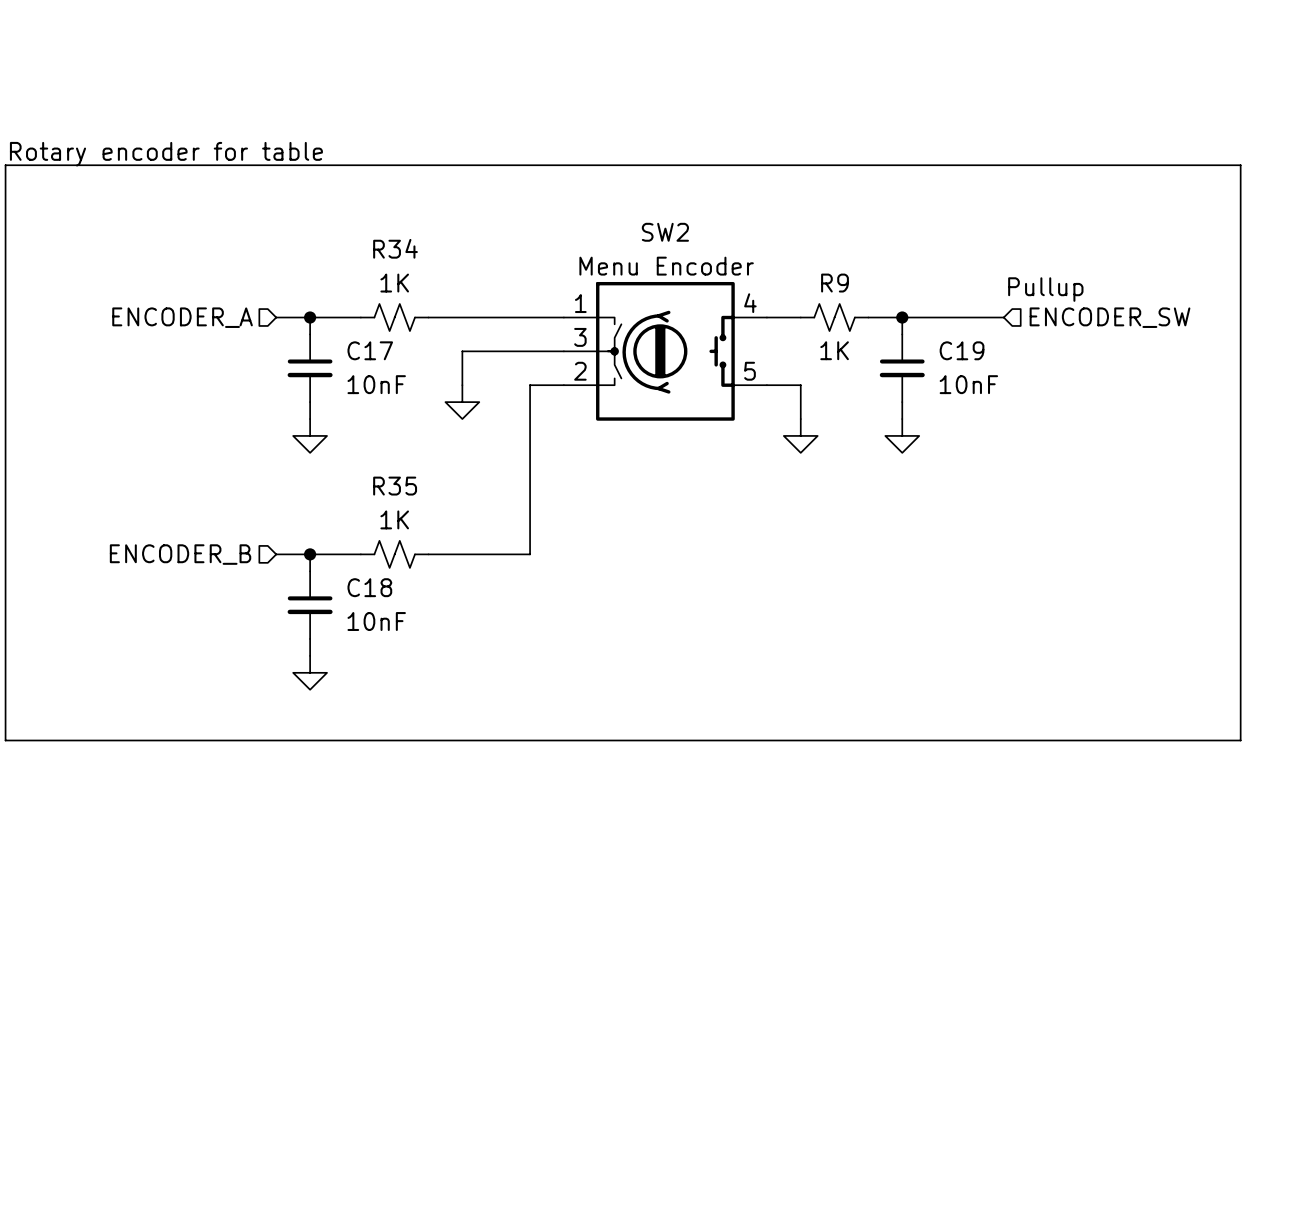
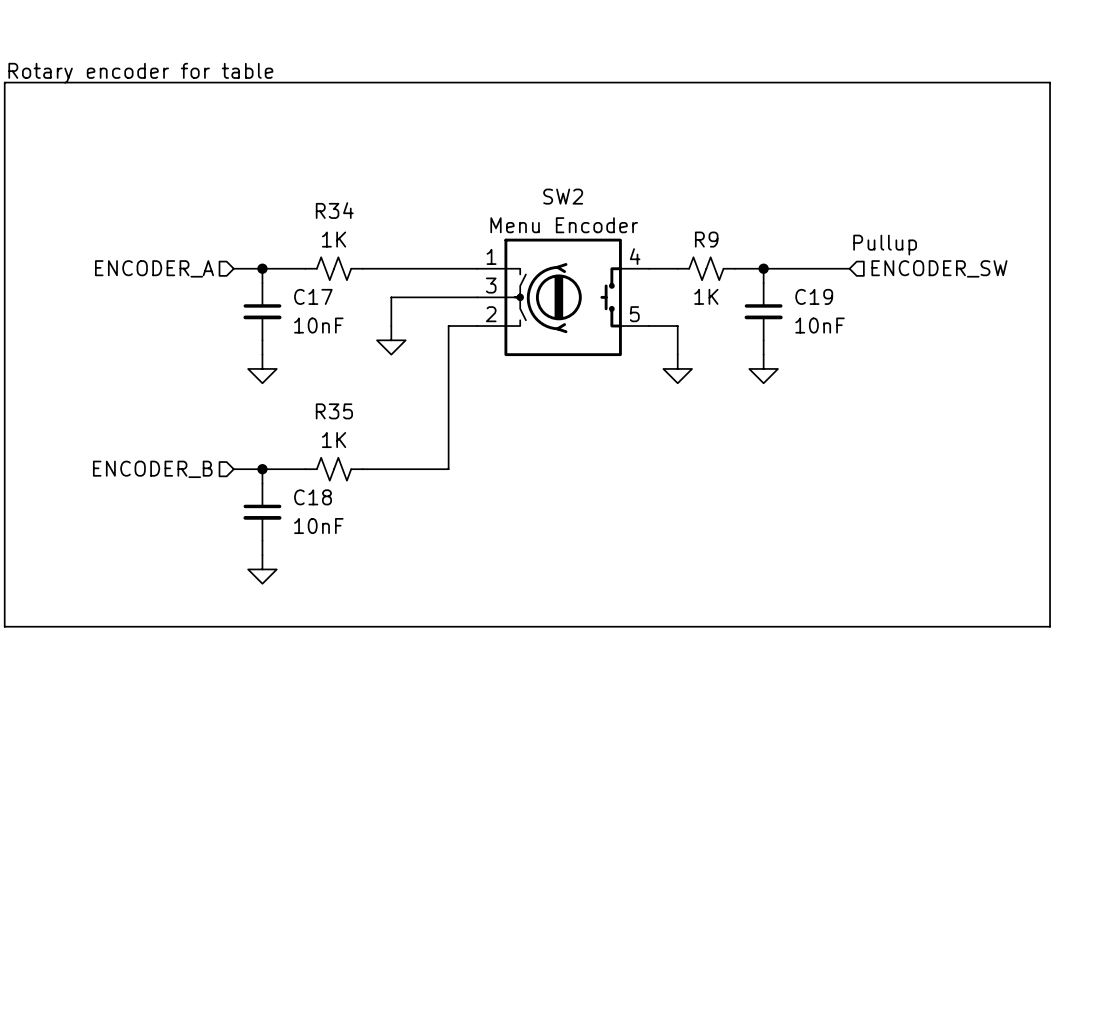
text position: Rotary encoder for table (166, 154) -> Rotary encoder for table (140, 73)
line: (5, 165) (1240, 165) -> (4, 139) (4, 82) (1050, 82) (1050, 139)

